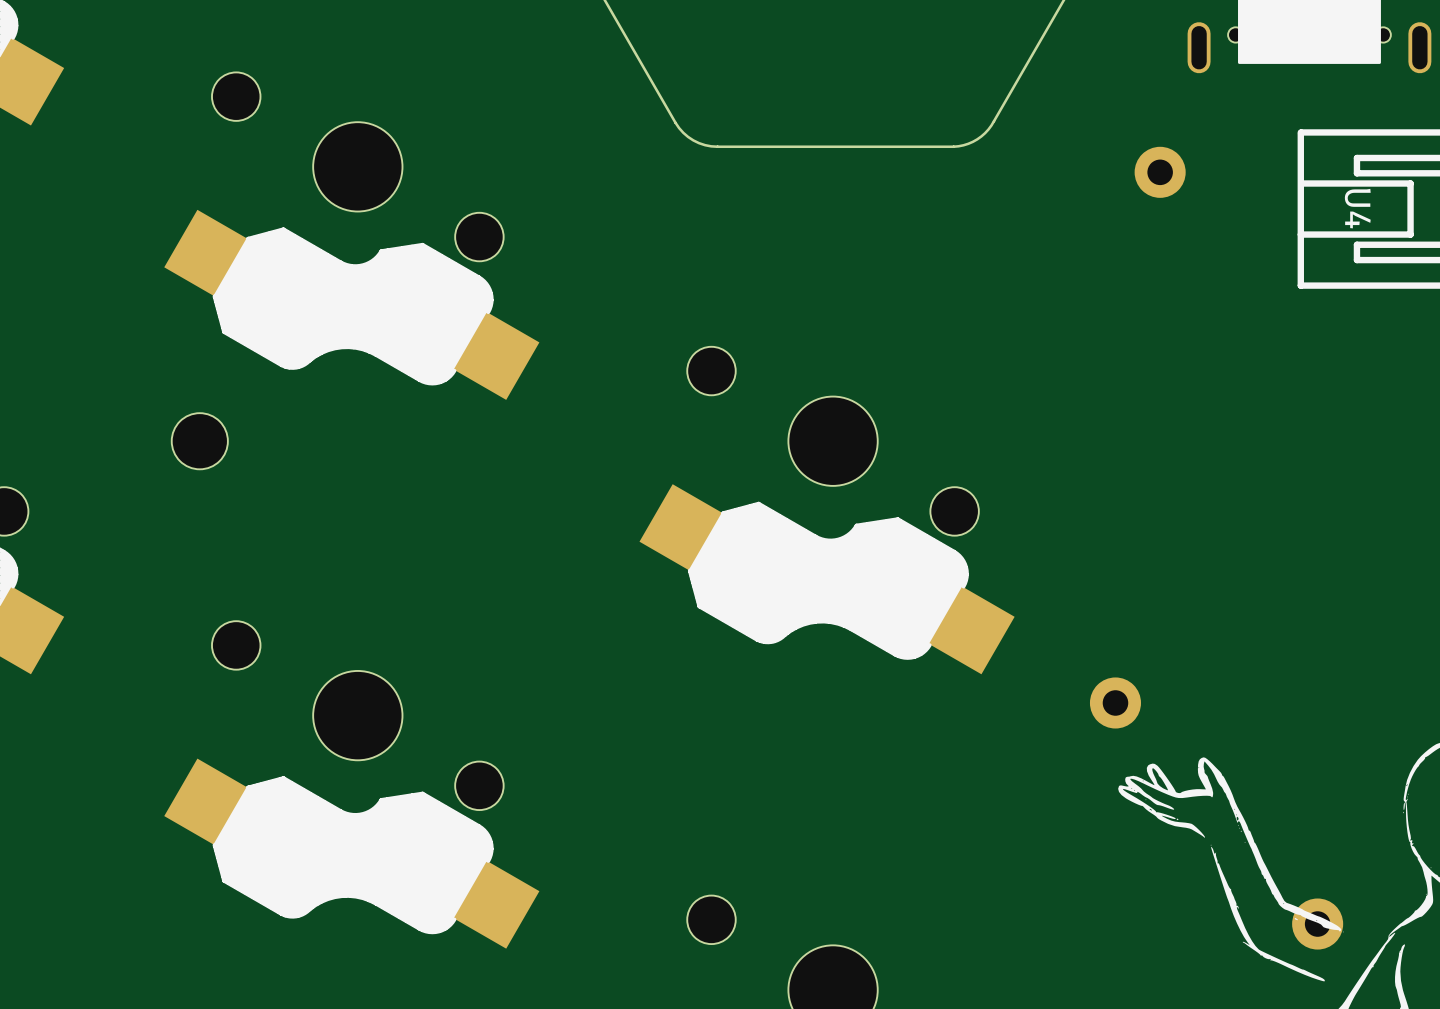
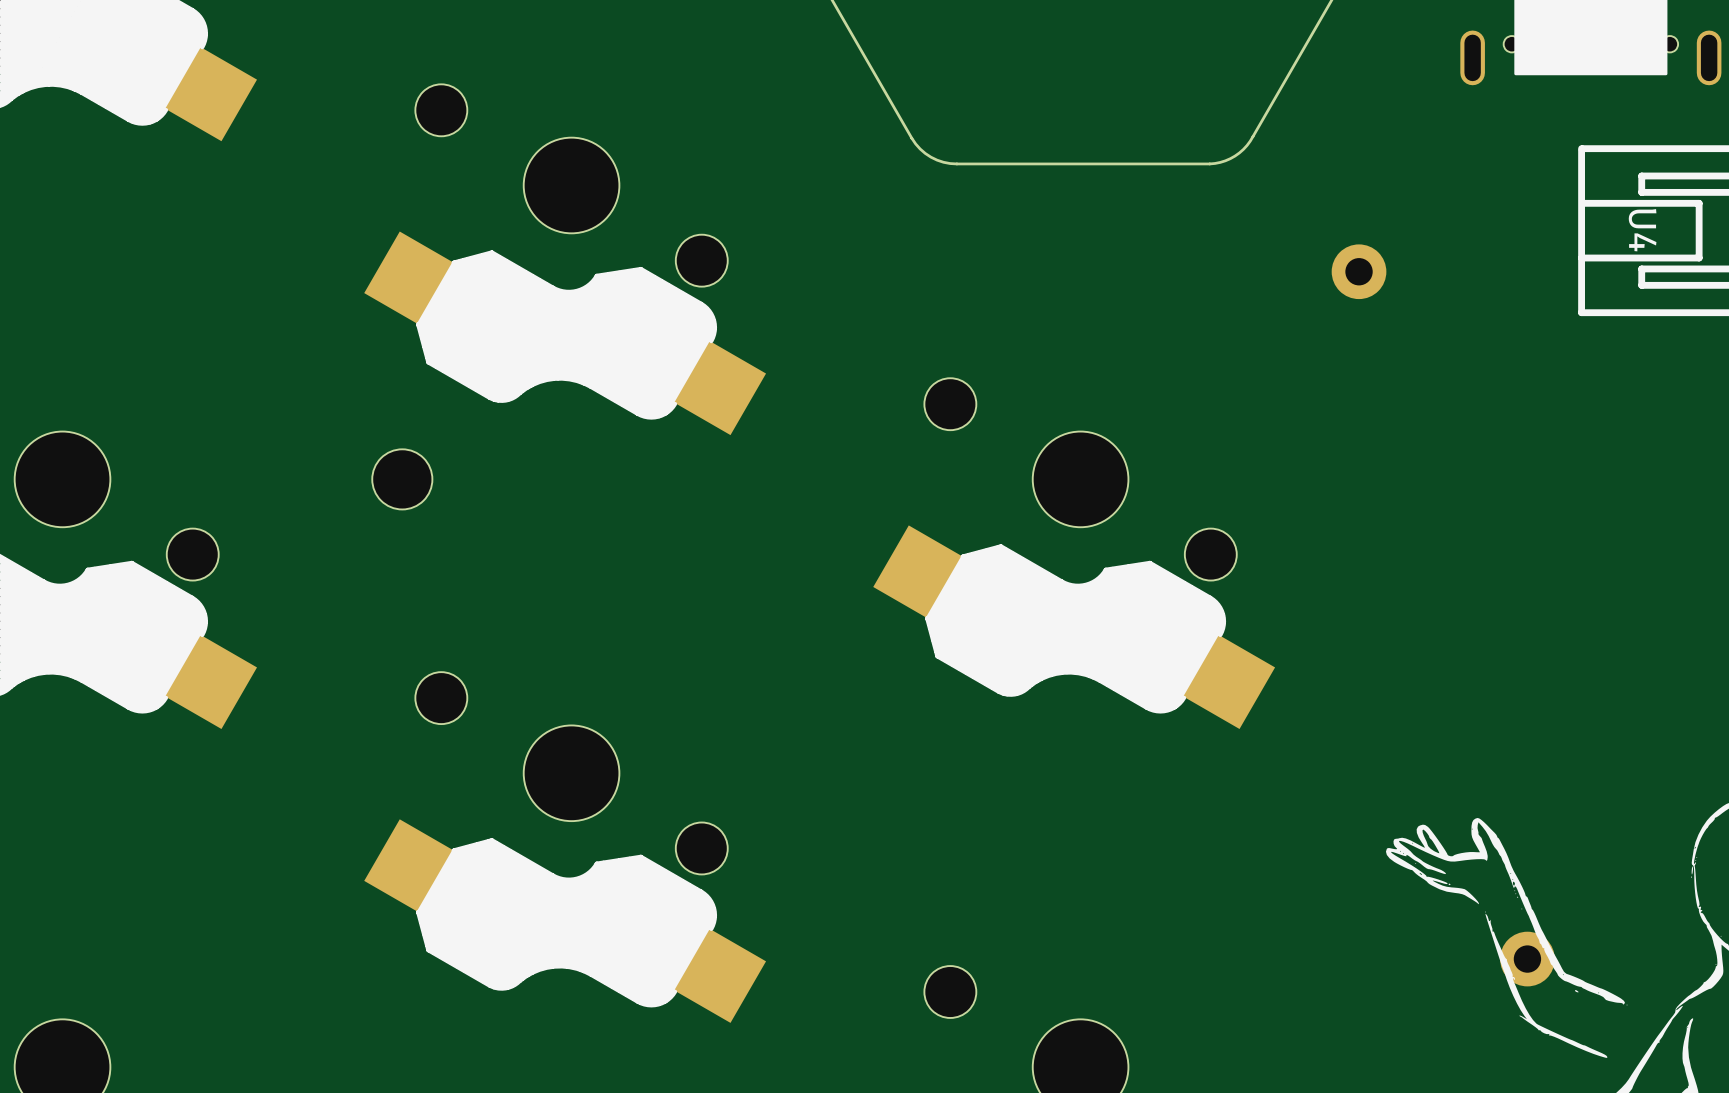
part position: (1160, 172) -> (1359, 271)
part: (1115, 702) -> none
part position: (1317, 924) -> (1527, 959)

